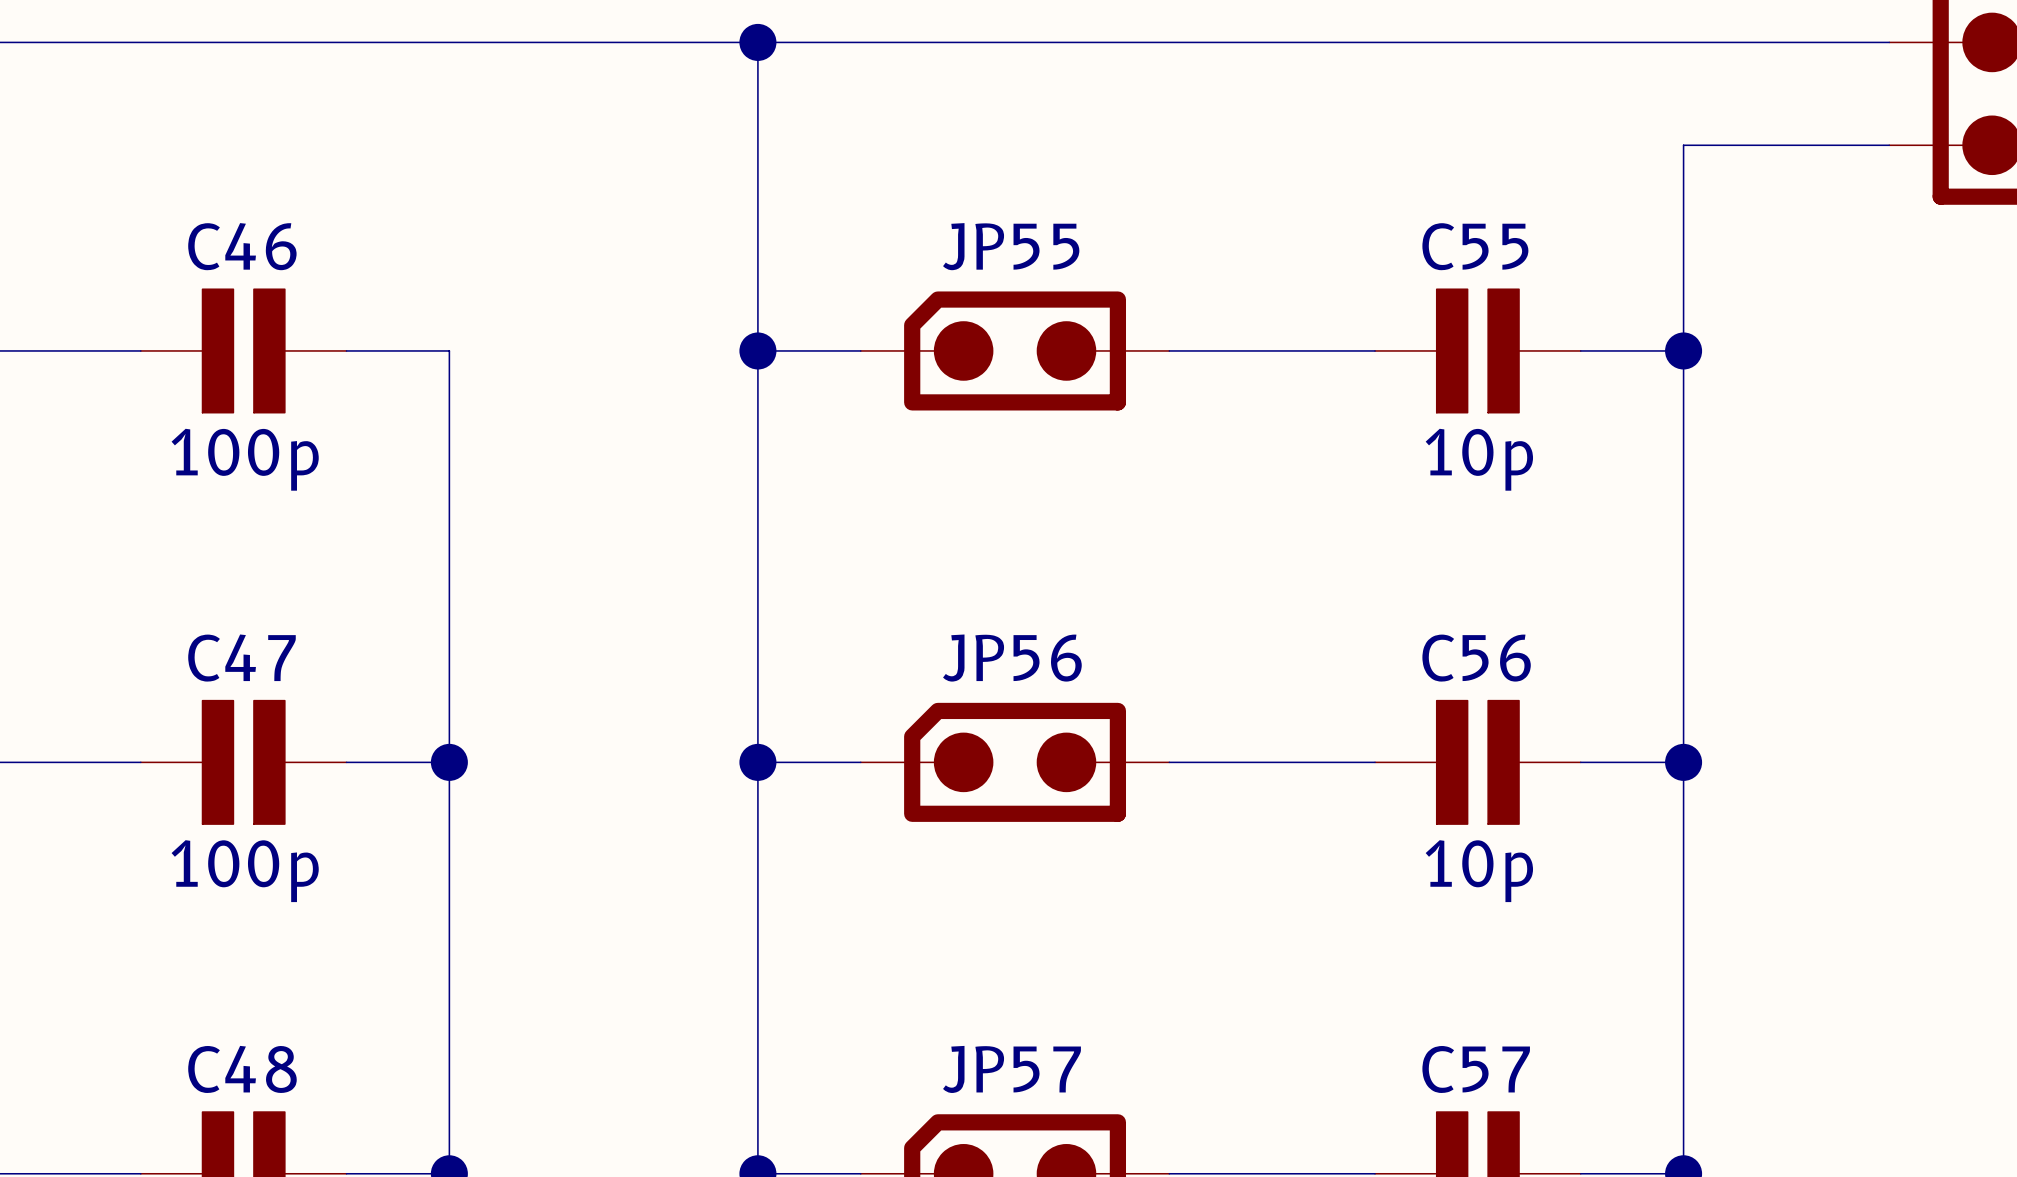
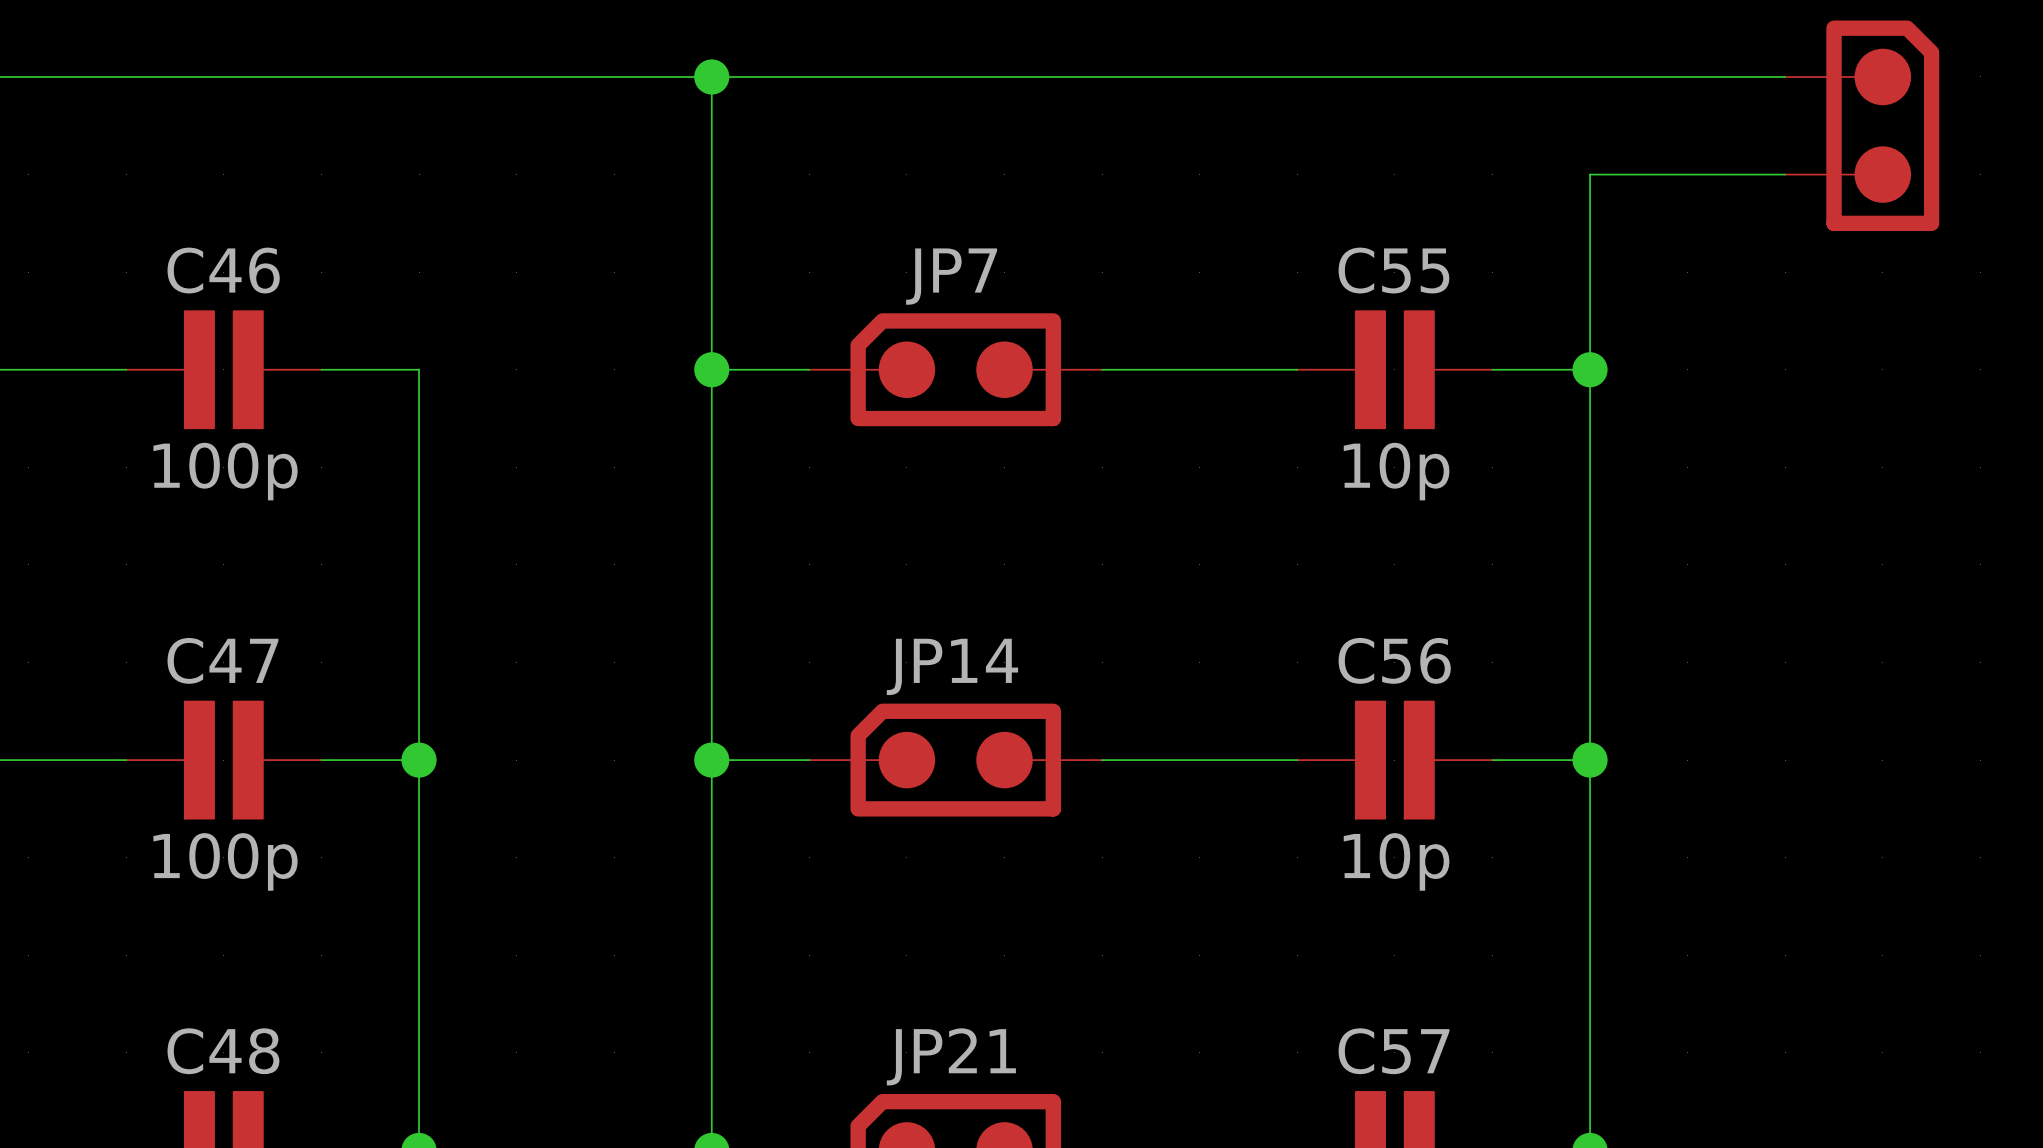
JP55 name: JP55 (1011, 246) -> JP7 (951, 276)
JP56 name: JP56 (1012, 658) -> JP14 (952, 666)
JP57 name: JP57 (1011, 1069) -> JP21 (951, 1056)

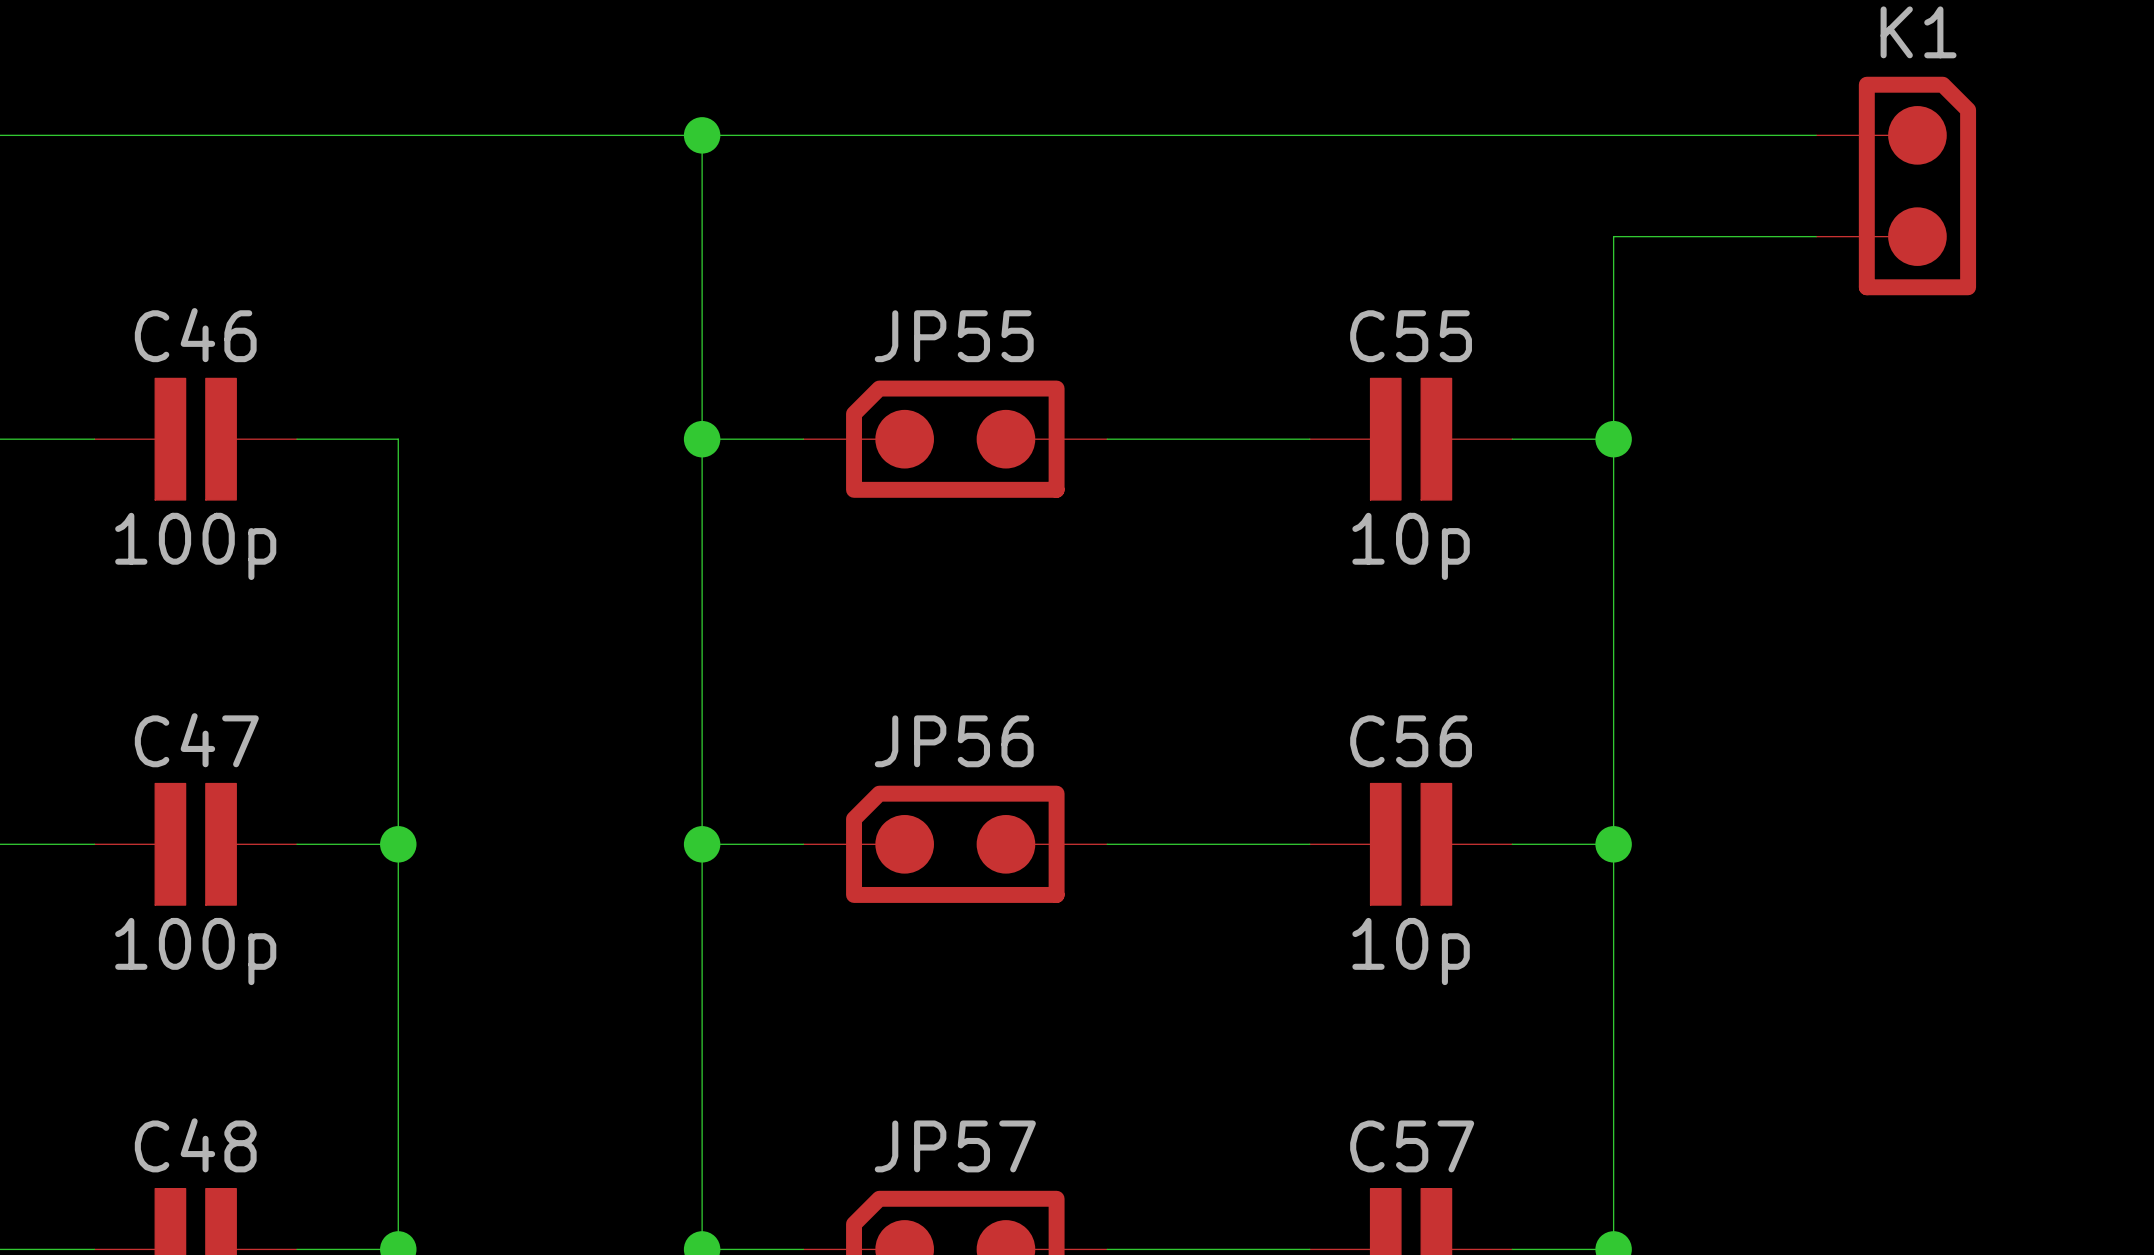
JP7 name: JP7 (951, 276) -> JP55 (954, 336)
JP14 name: JP14 (952, 666) -> JP56 (954, 741)
JP21 name: JP21 (951, 1056) -> JP57 (955, 1146)

